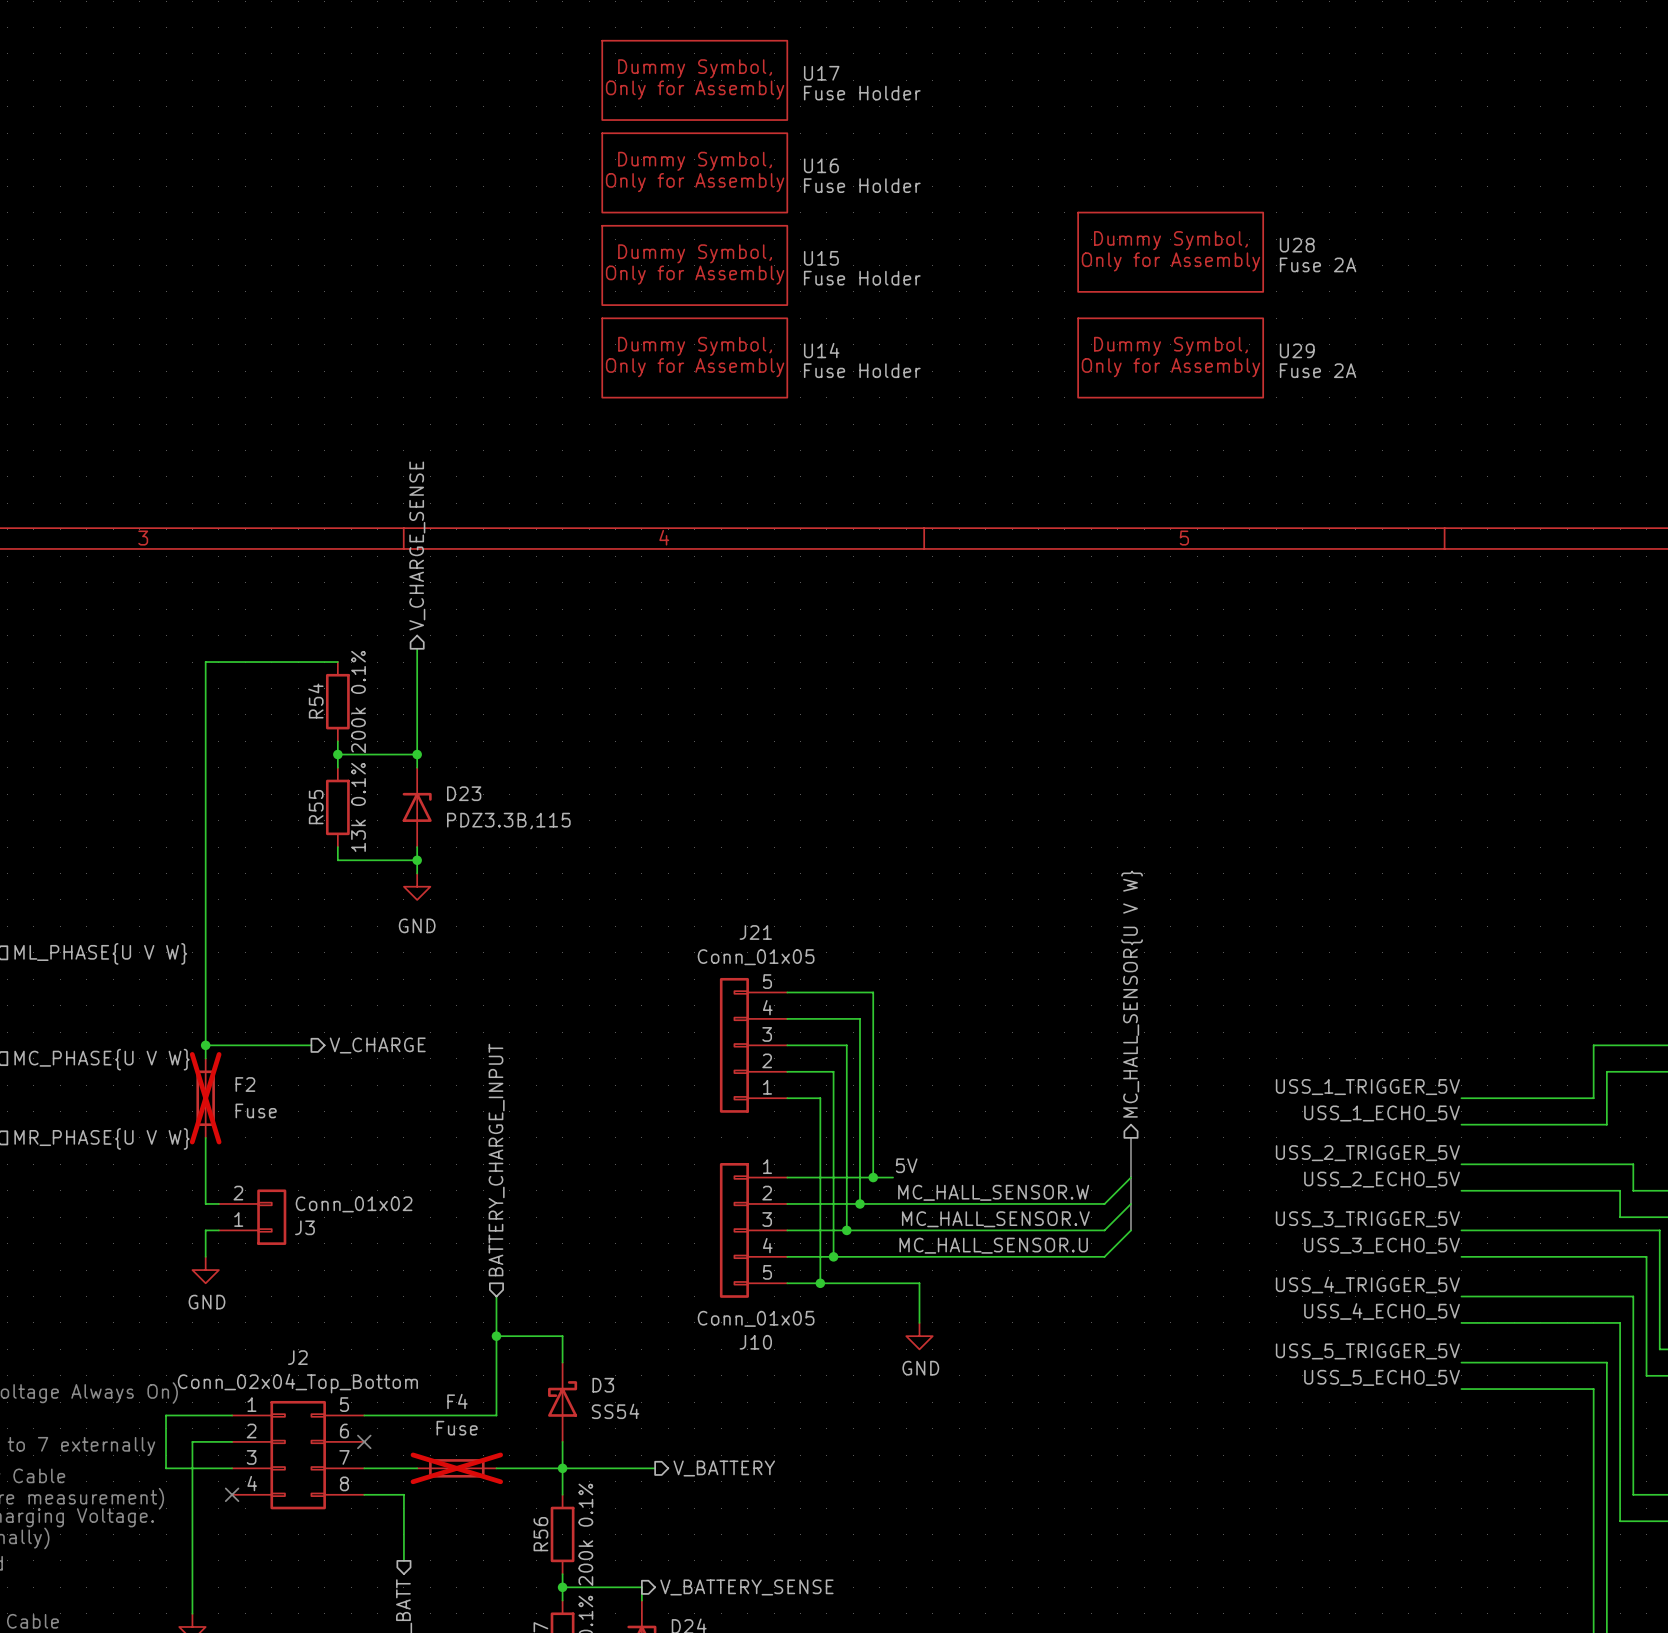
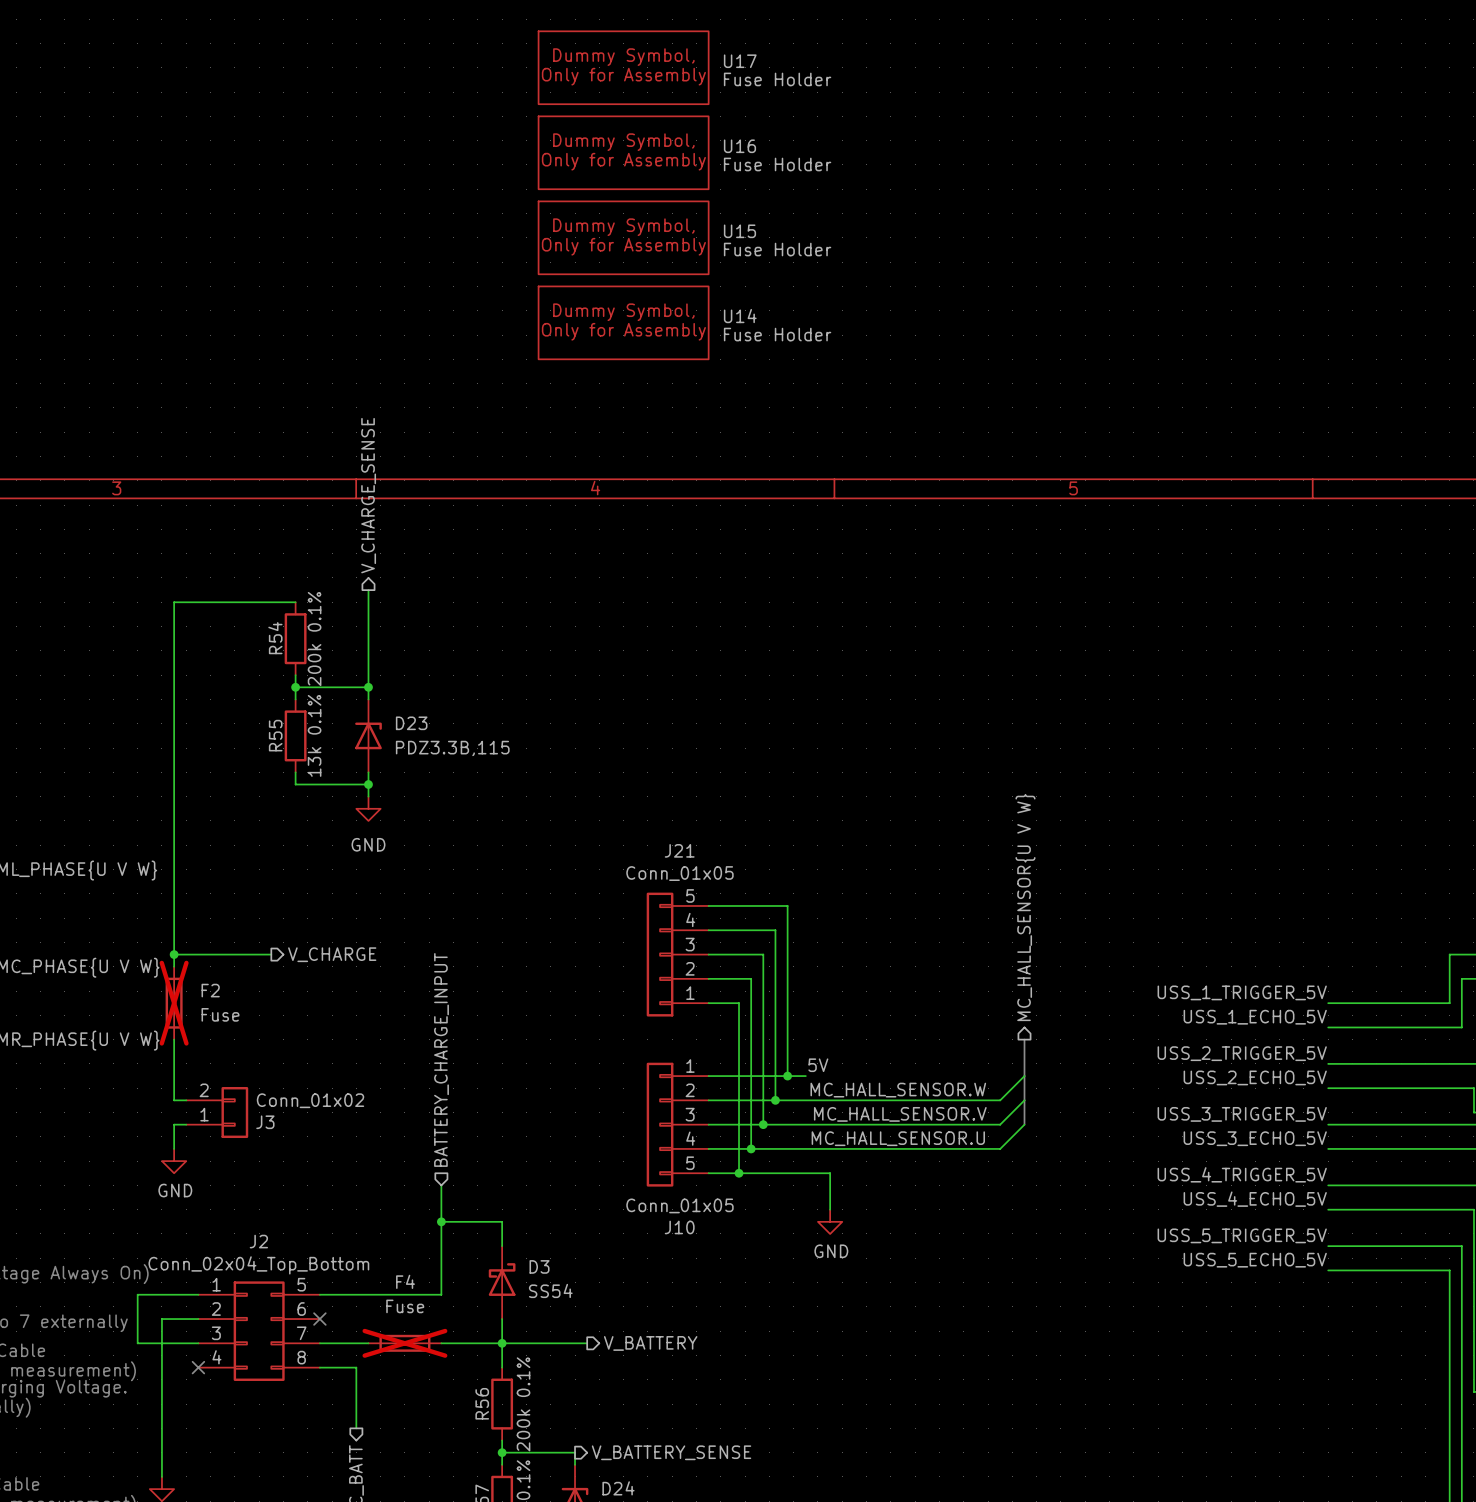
U28: Fuse 2A (1170, 252) -> none
U29: Fuse 2A (1170, 357) -> none

